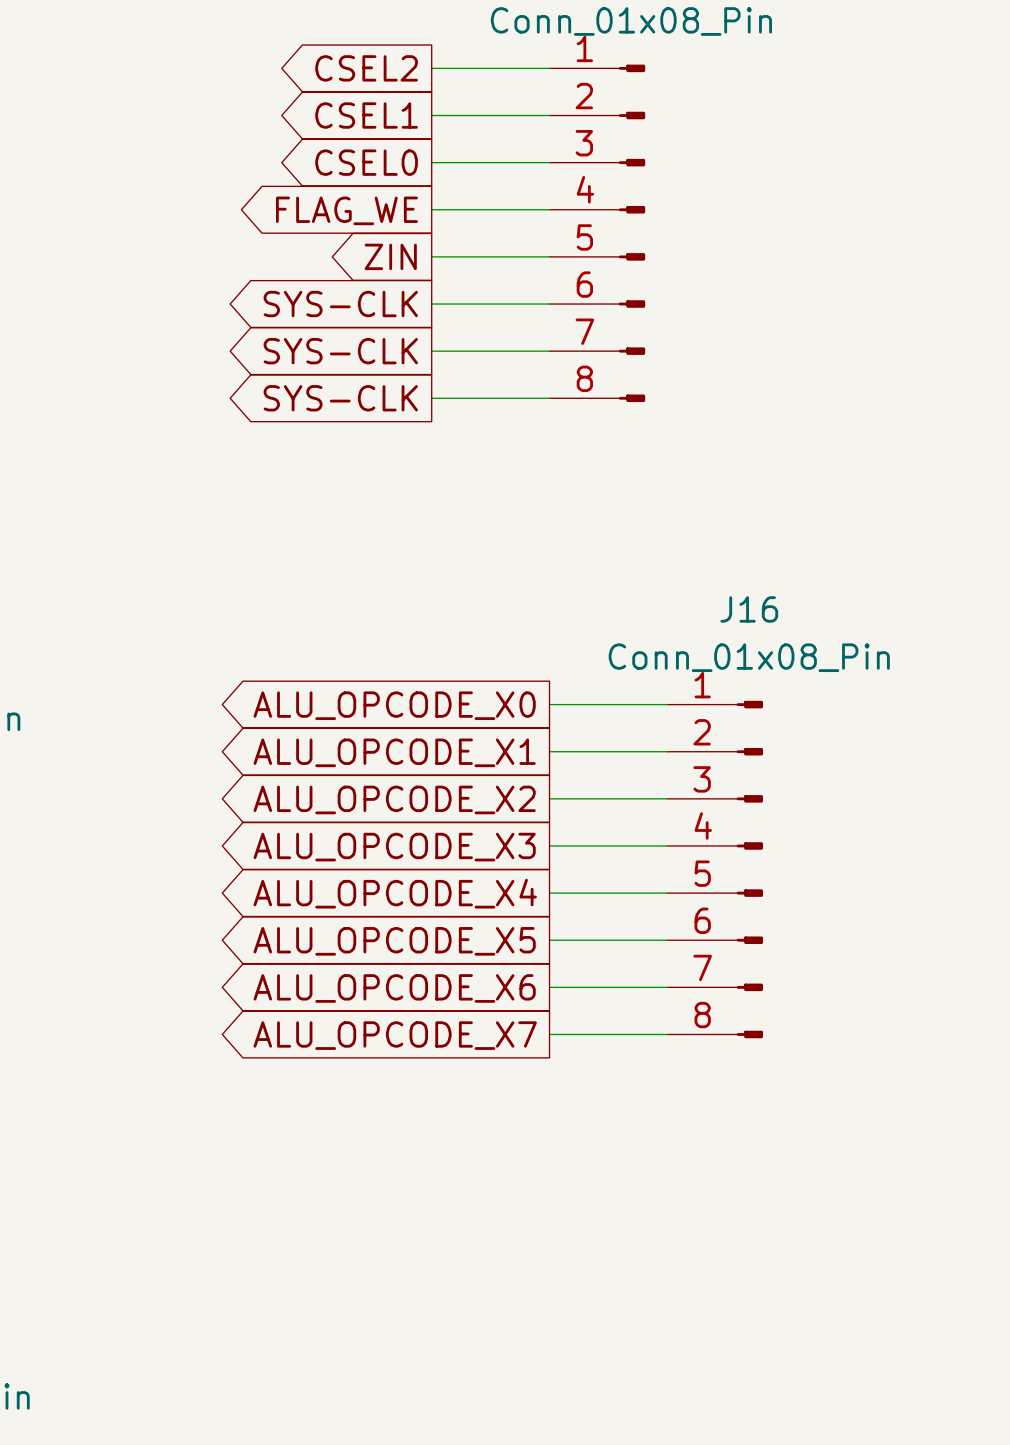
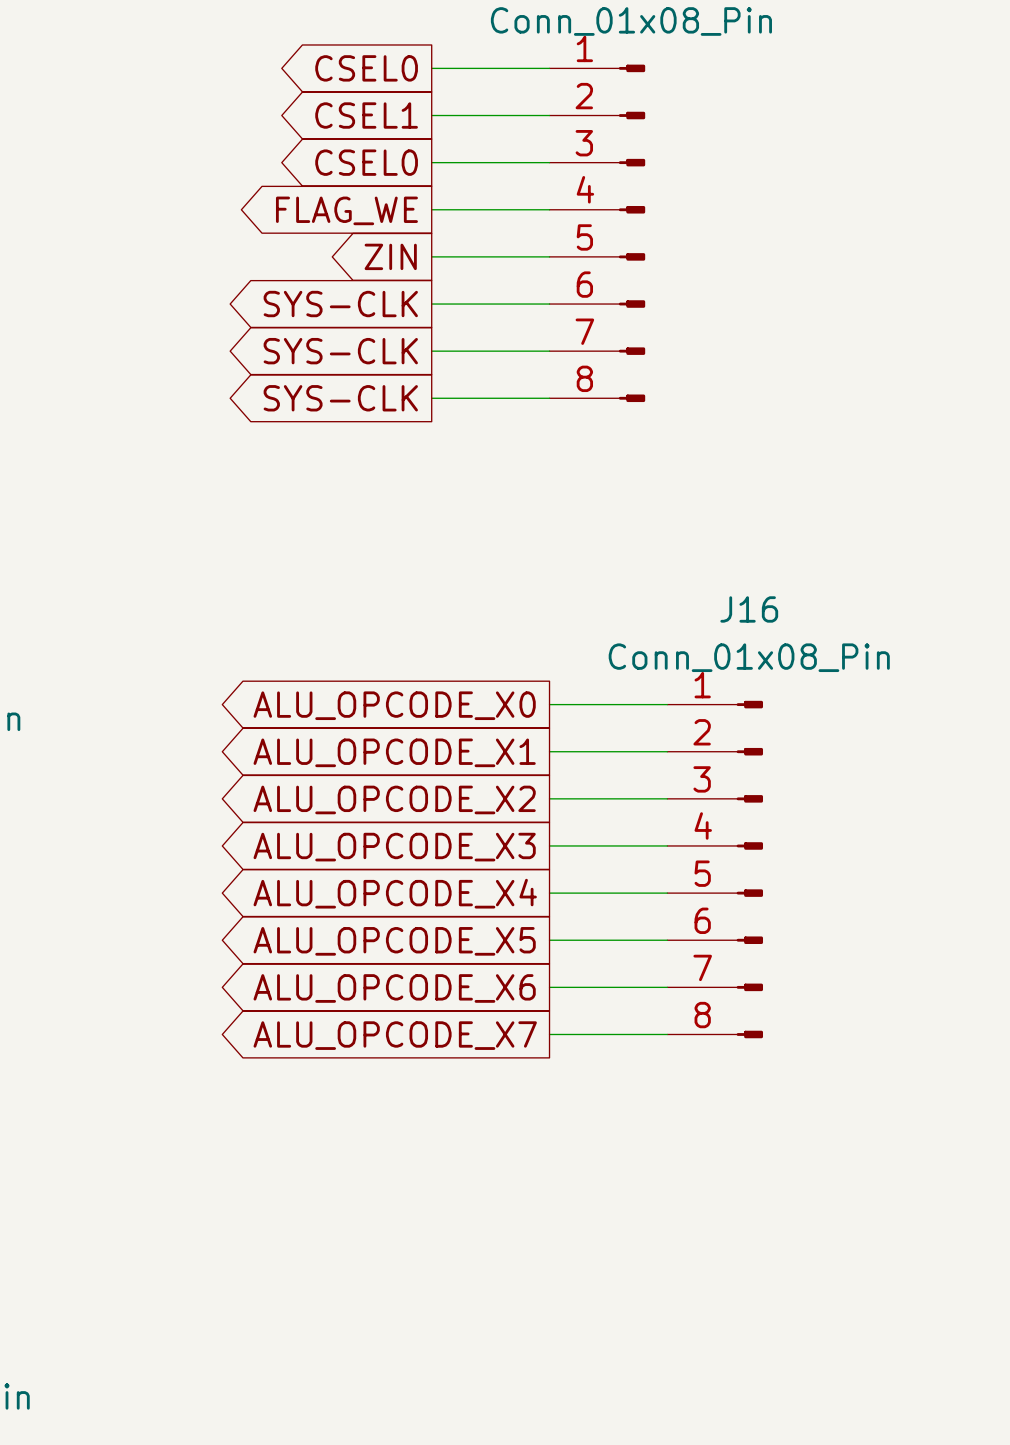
global label: CSEL2 (366, 68) -> CSEL0 (366, 68)

